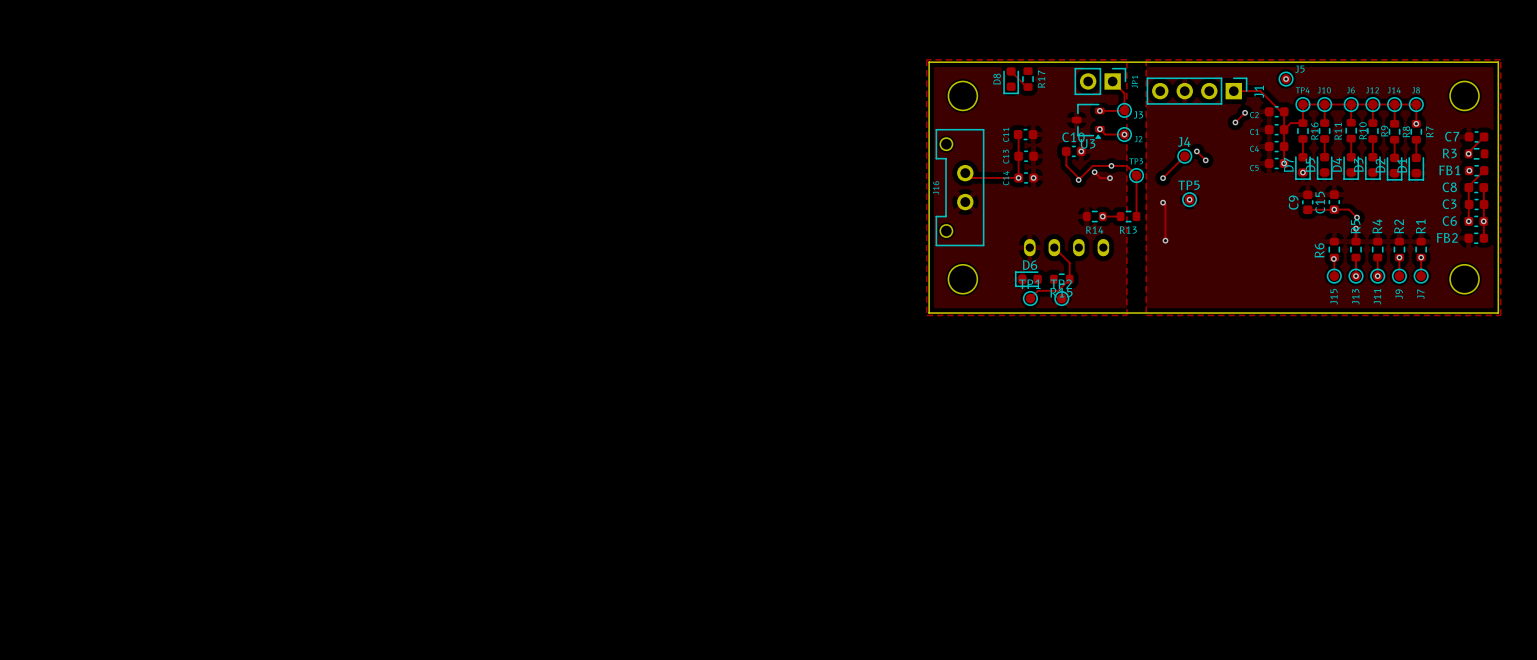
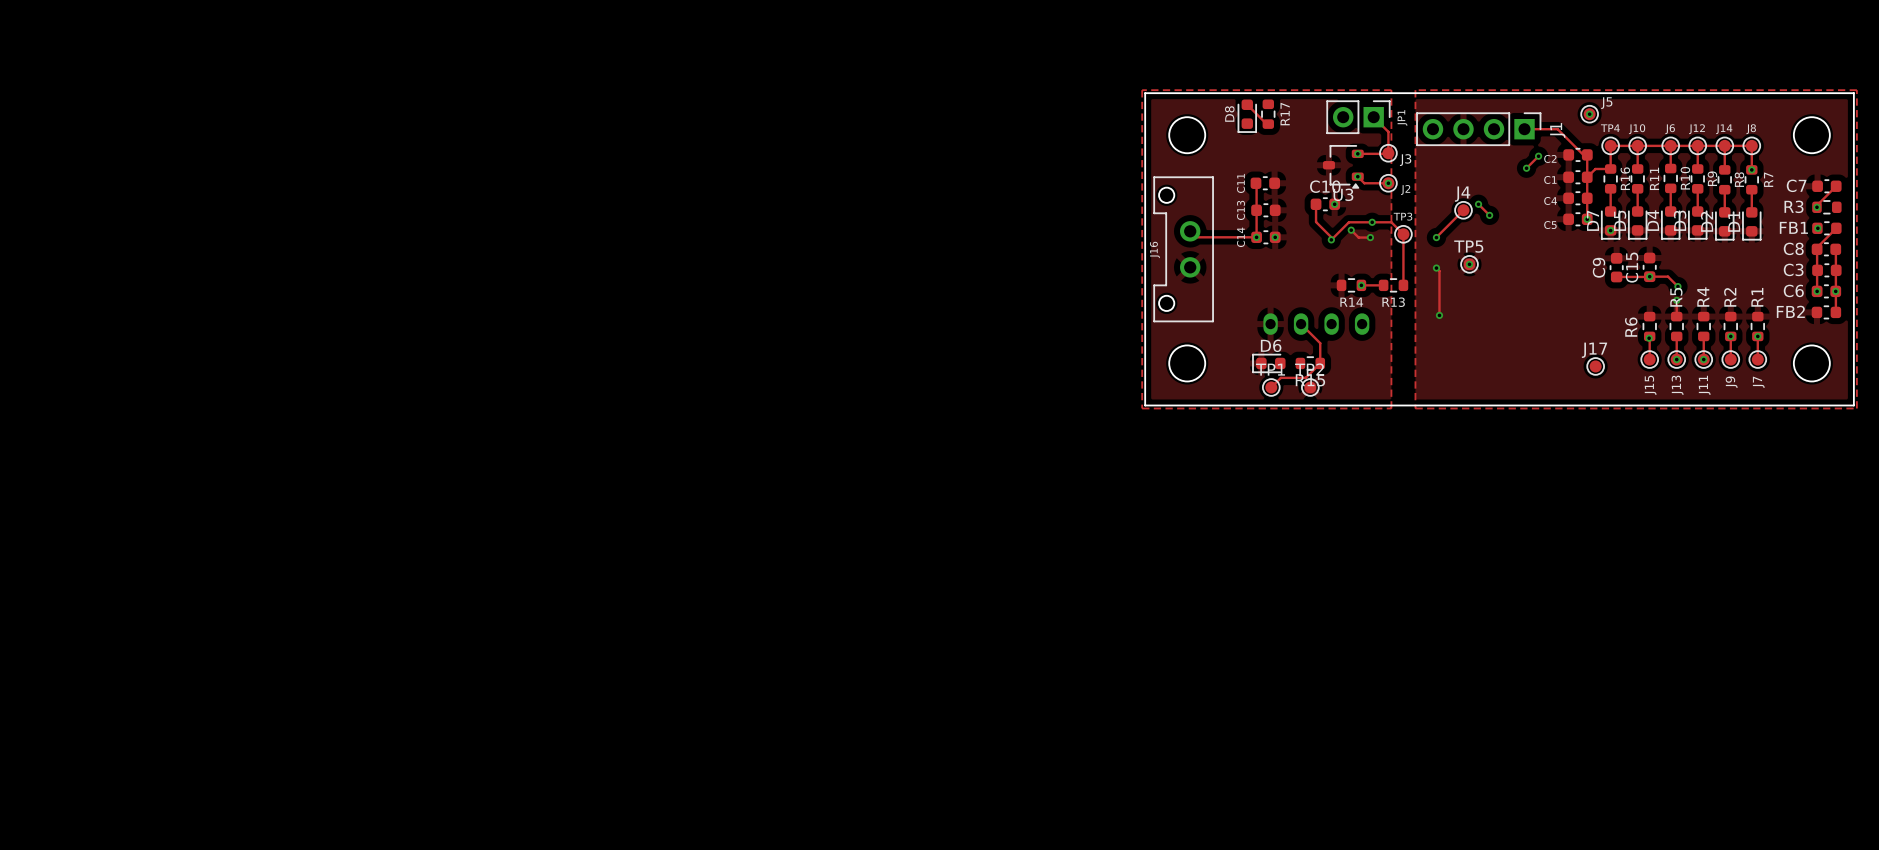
J17: none -> (1595, 366)

